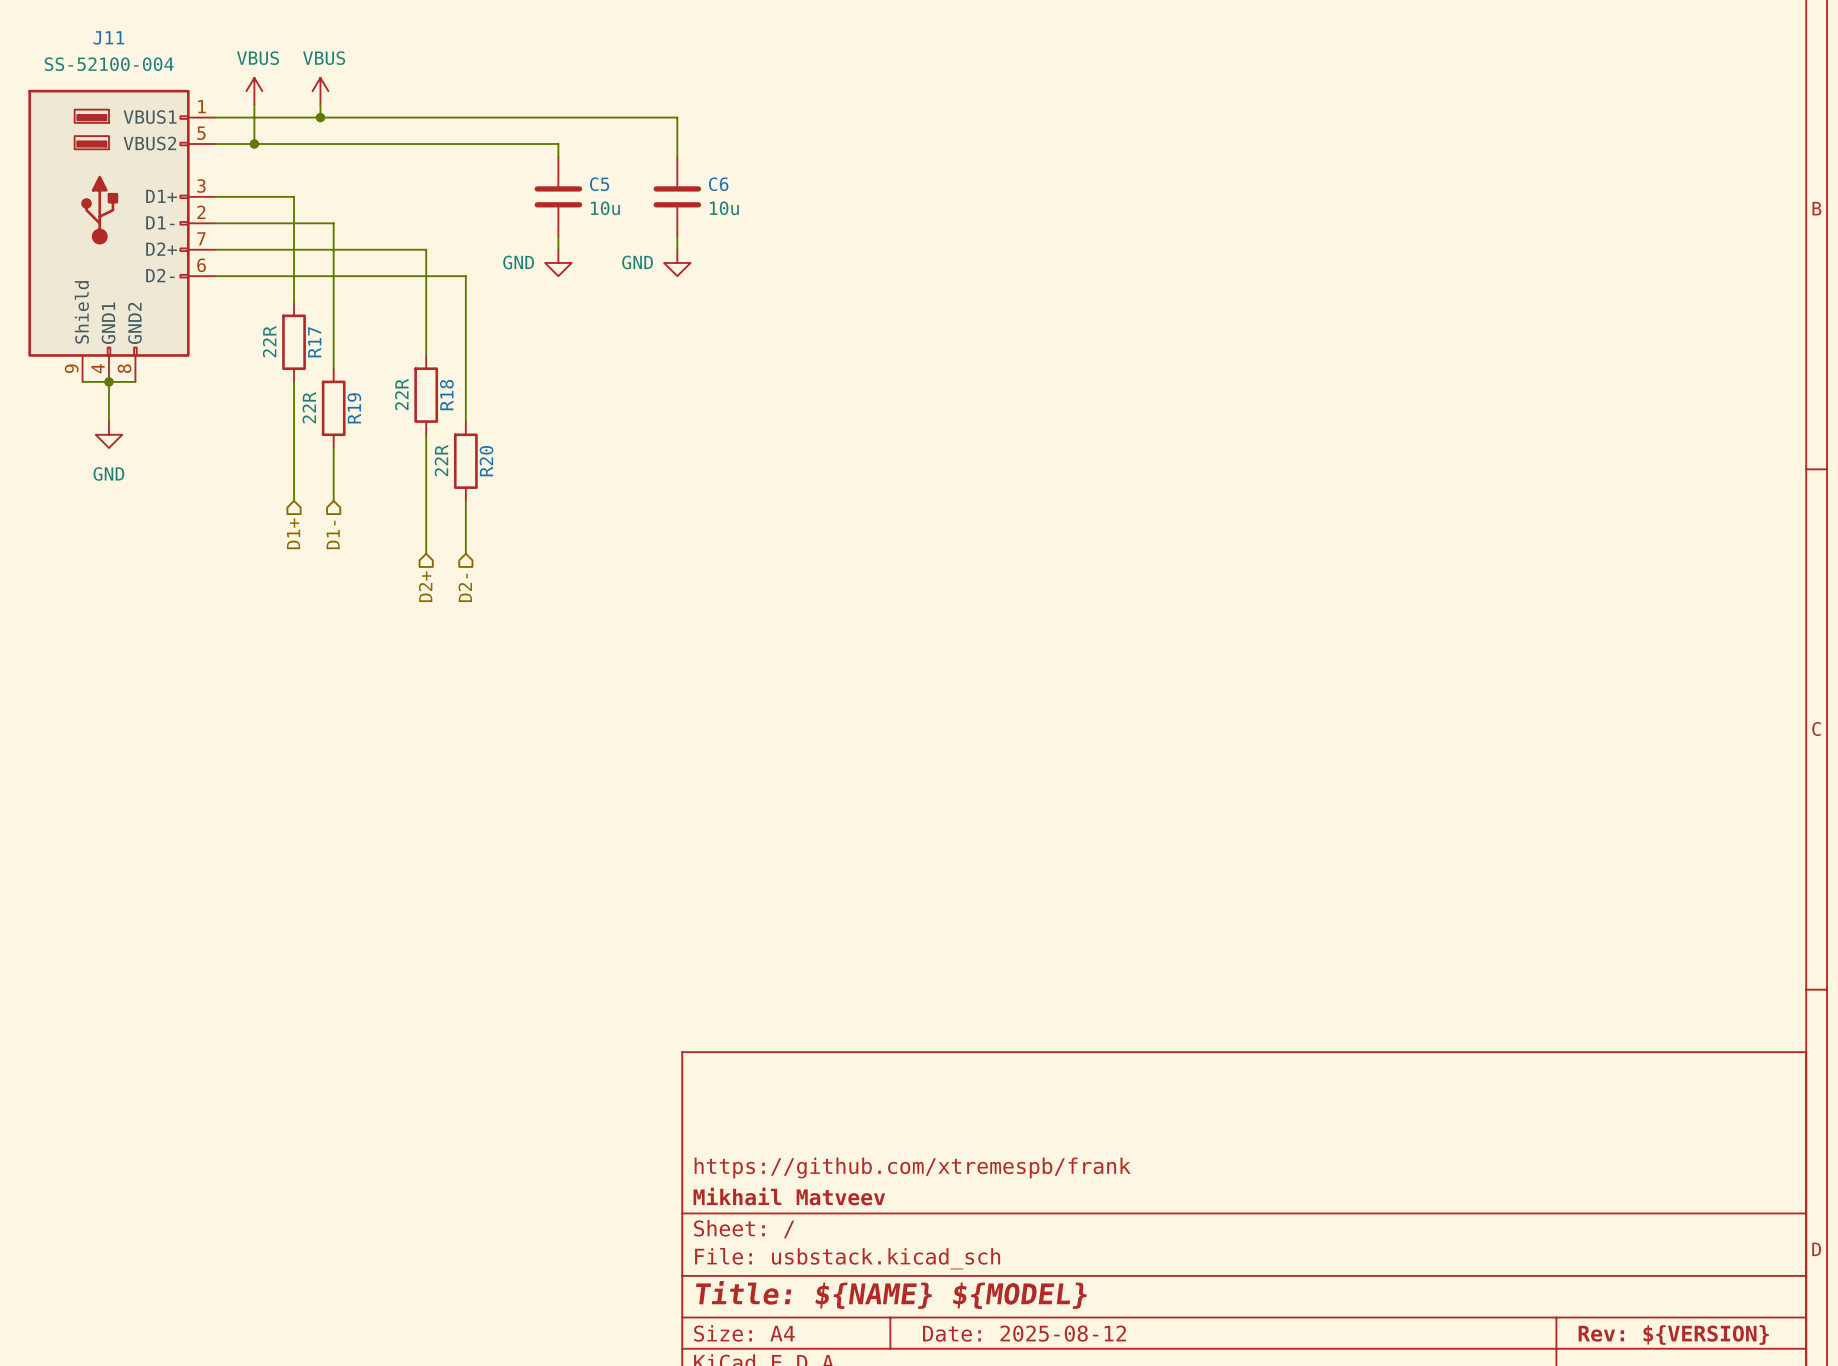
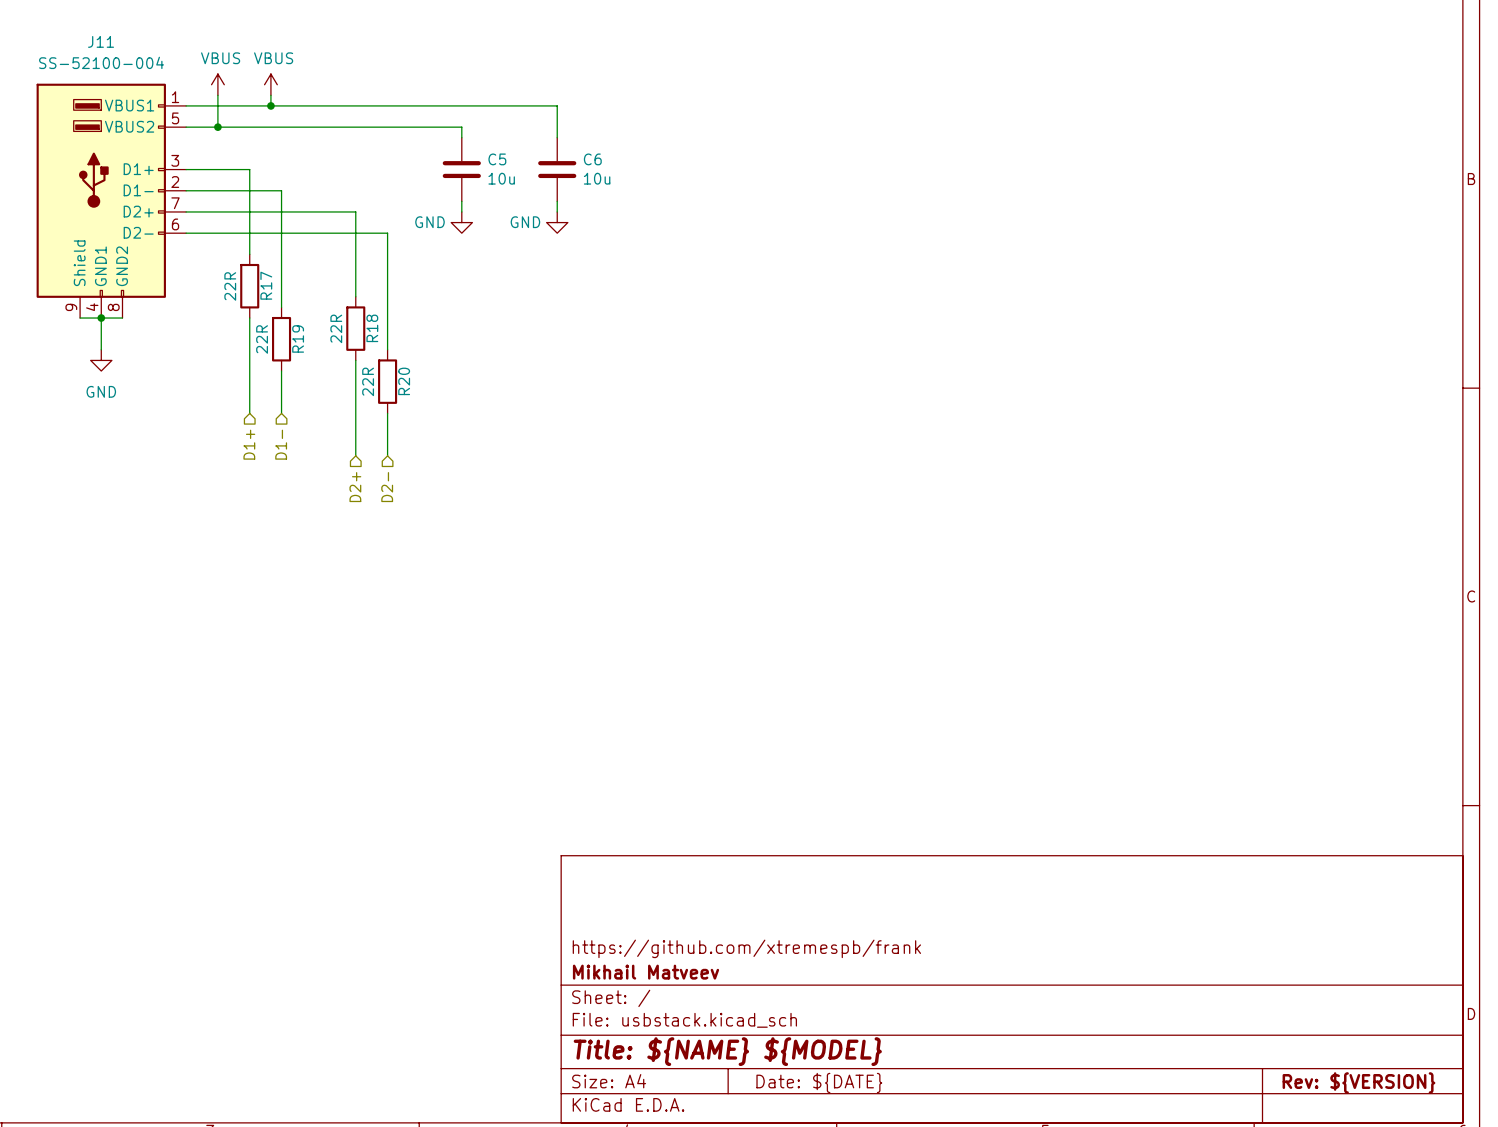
title block: Date: 2025-08-12 (1024, 1333) -> Date: ${DATE} (819, 1083)

